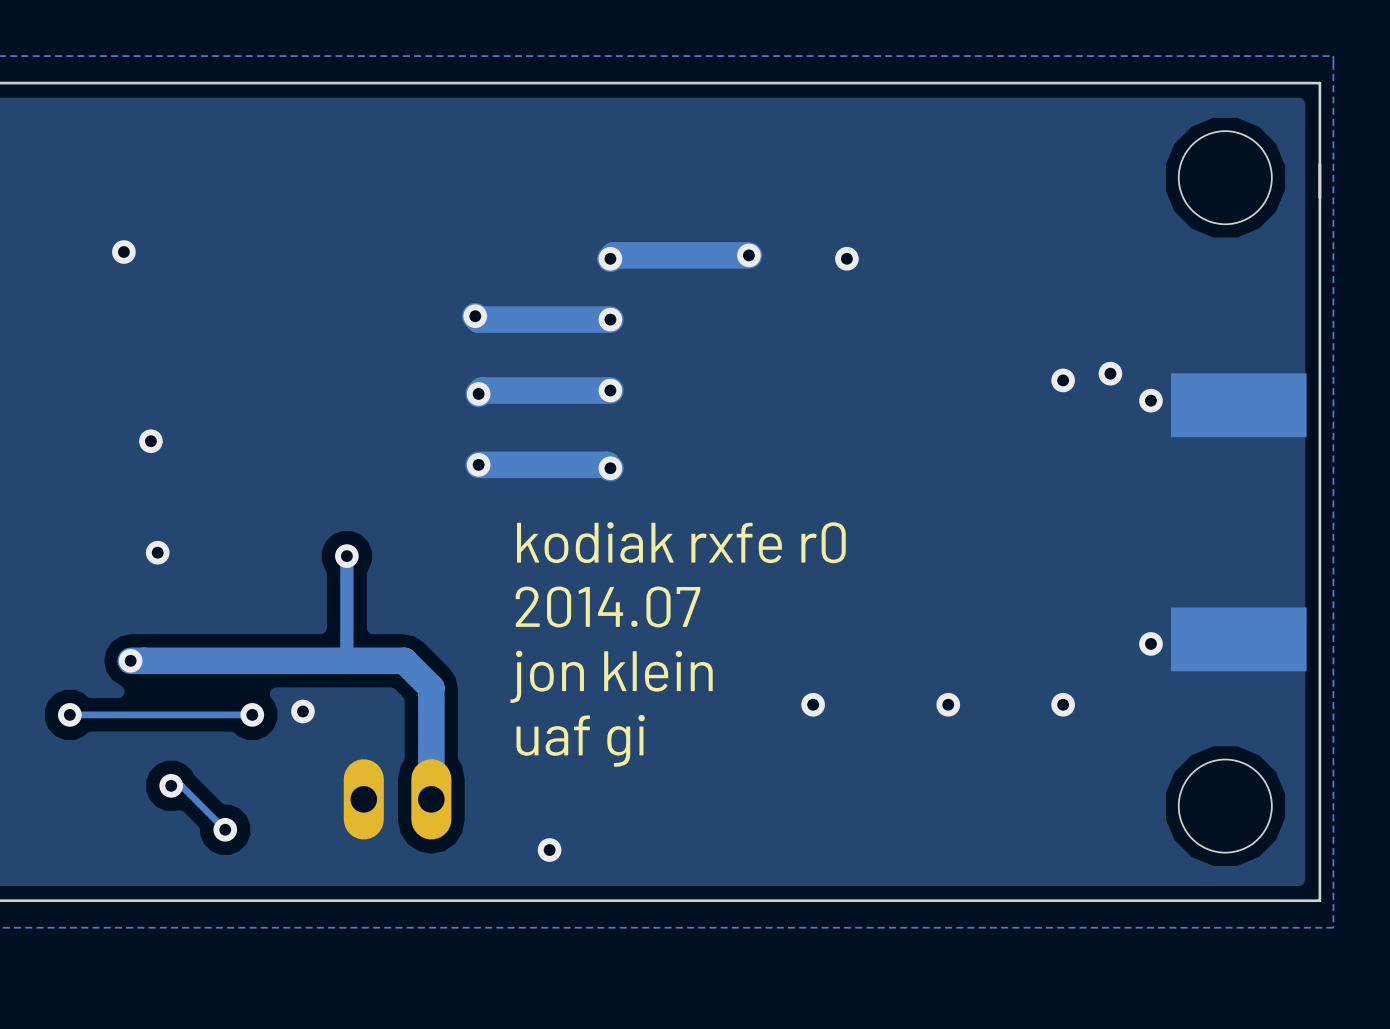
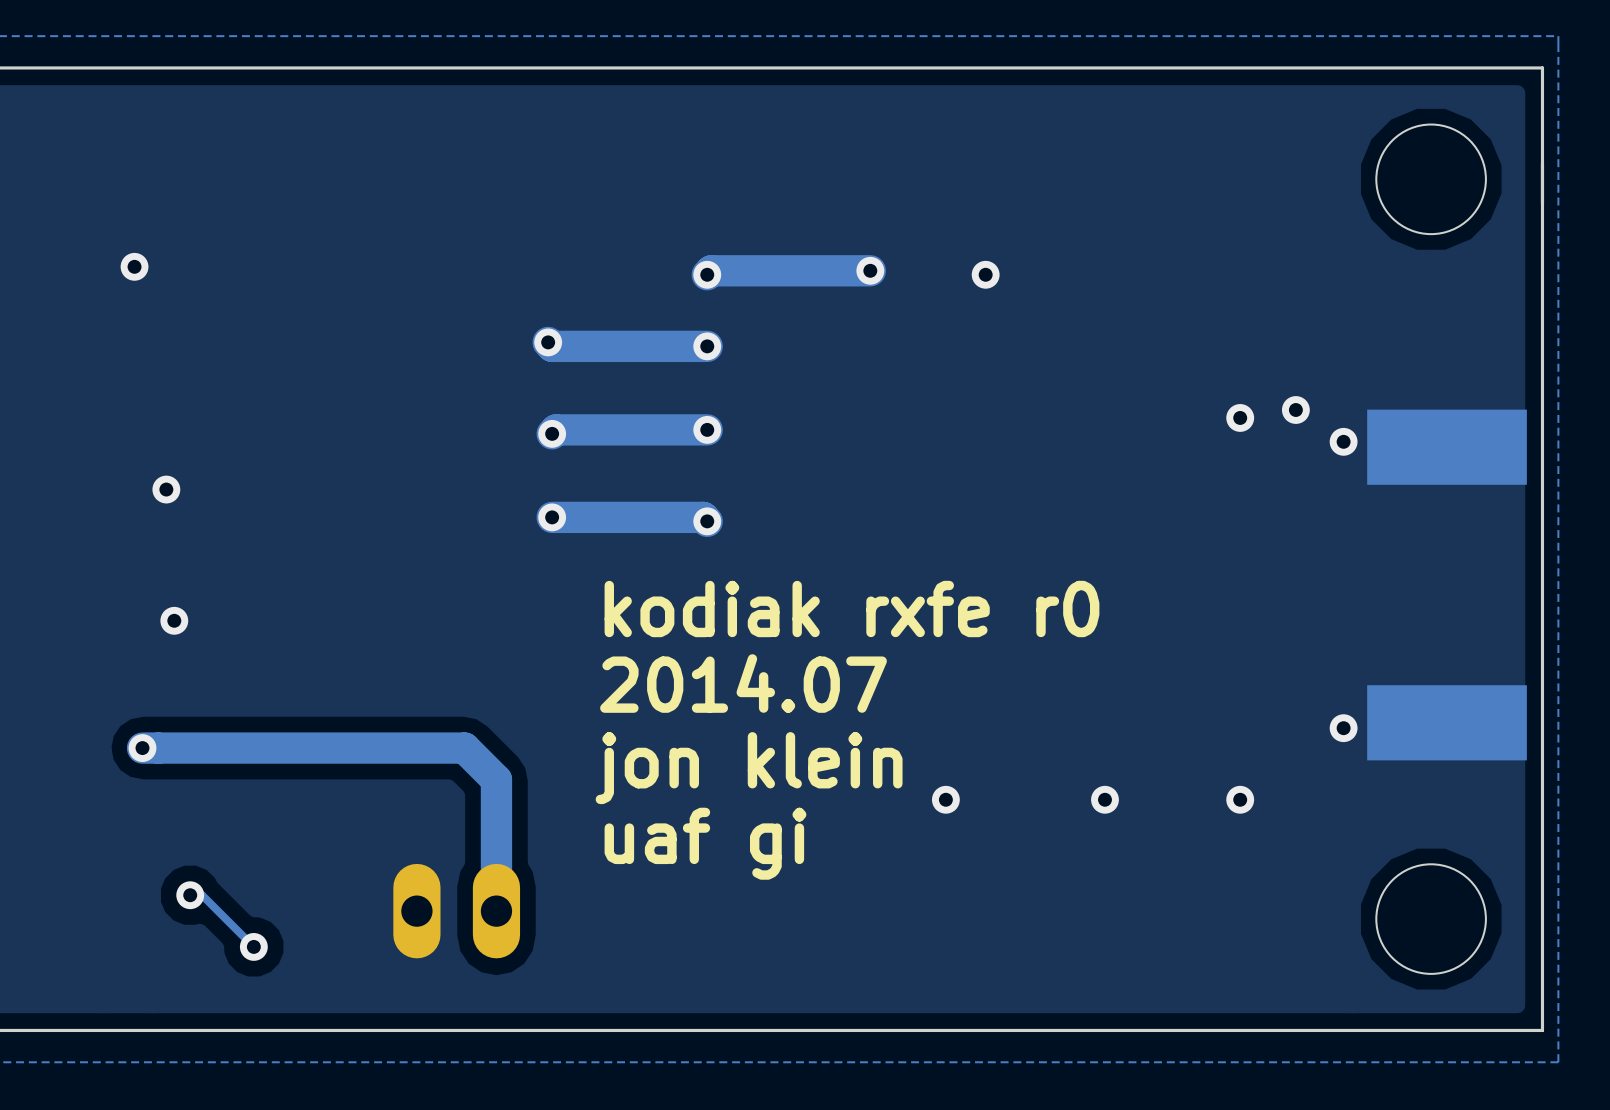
track: (346, 556) (346, 660) -> none
via: (346, 556) -> none
via: (302, 711) -> none
via: (69, 714) -> none
track: (252, 714) (69, 714) -> none
via: (252, 714) -> none
via: (549, 850) -> none

